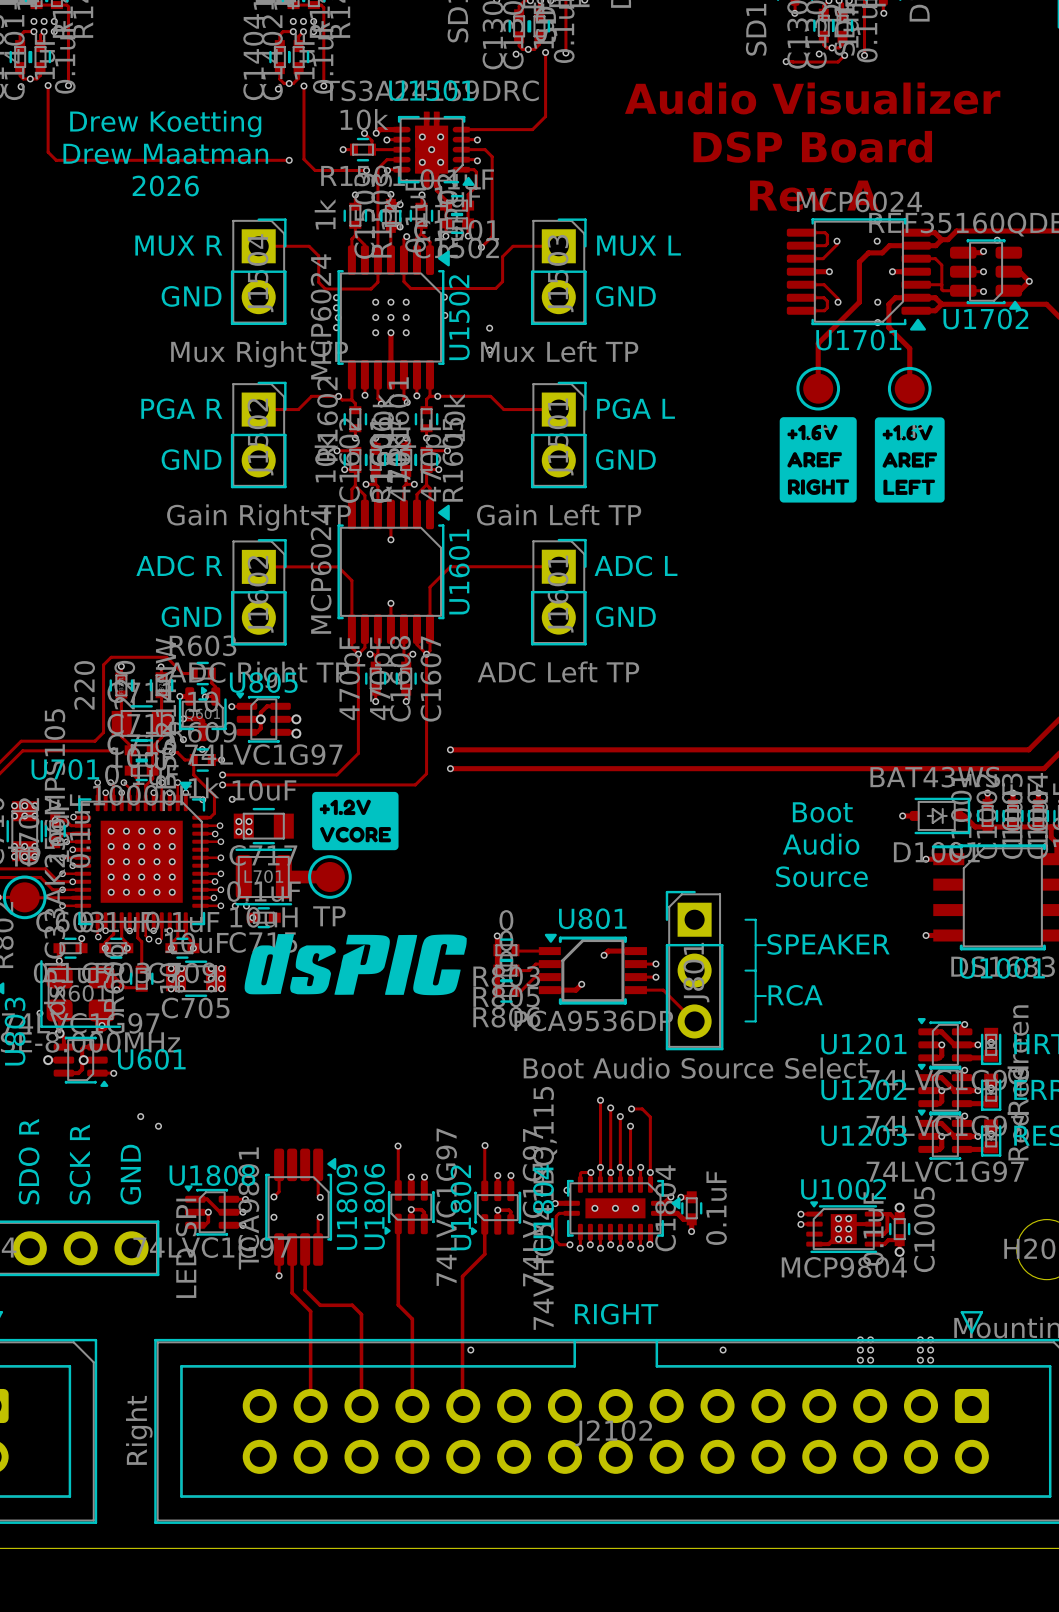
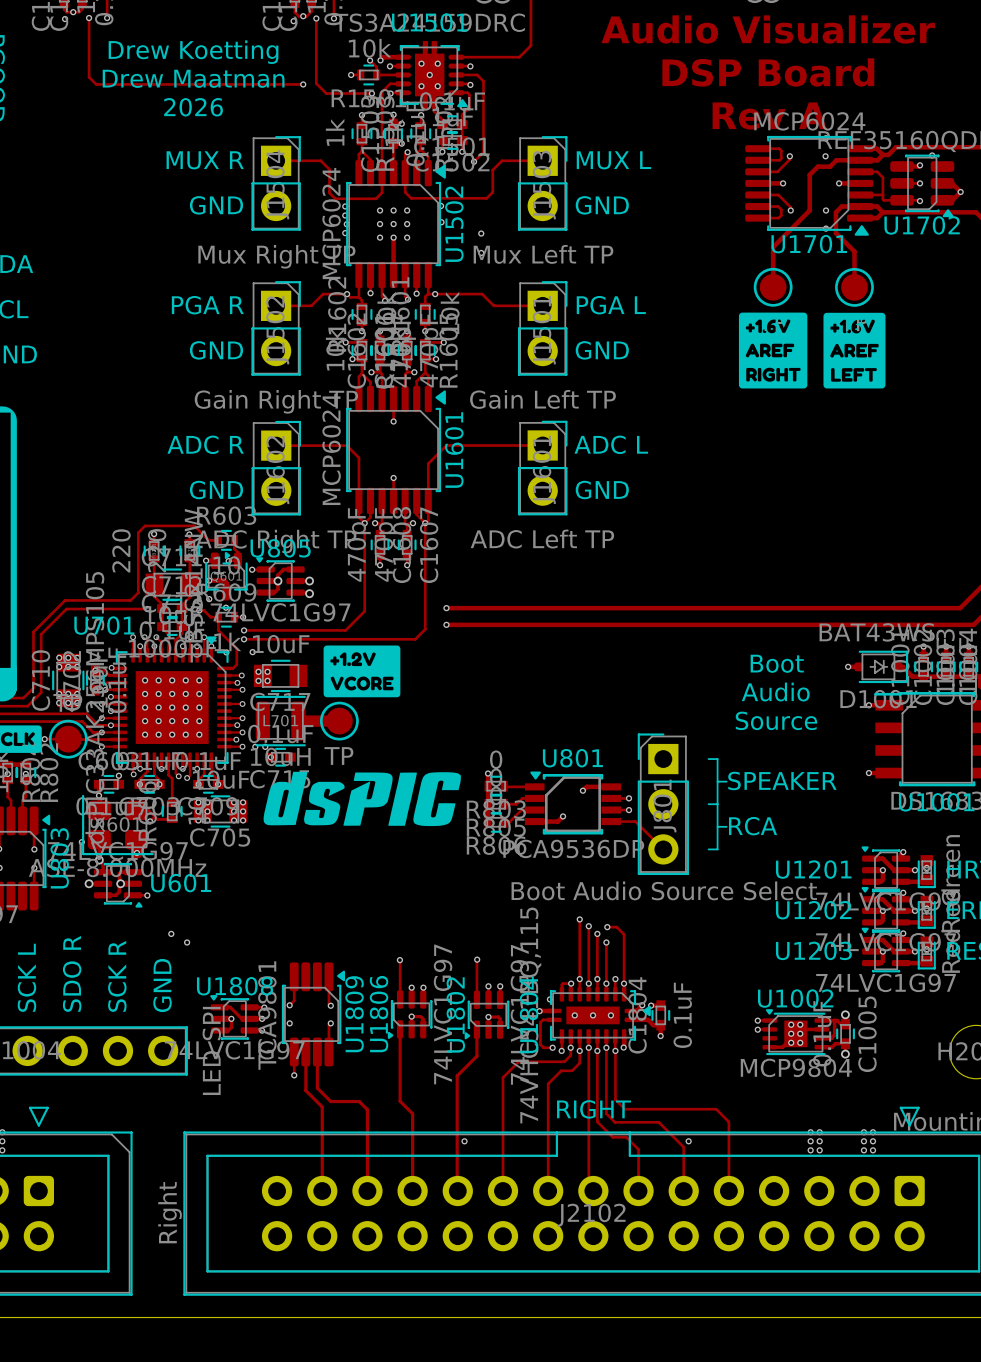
track: none -> (570, 1047) (570, 1055) (564, 1061) (518, 1061) (502, 1077) (502, 1191)
track: none -> (588, 1047) (588, 1186) (593, 1191)
track: none -> (606, 1047) (606, 1113) (615, 1122) (658, 1122) (683, 1147) (683, 1191)
track: none -> (579, 1050) (579, 1063) (572, 1070) (561, 1070) (548, 1083) (548, 1191)
track: none -> (597, 1050) (597, 1121) (612, 1137) (626, 1137) (638, 1149) (638, 1191)
track: none -> (615, 1050) (615, 1099) (624, 1109) (716, 1109) (728, 1121) (728, 1191)

